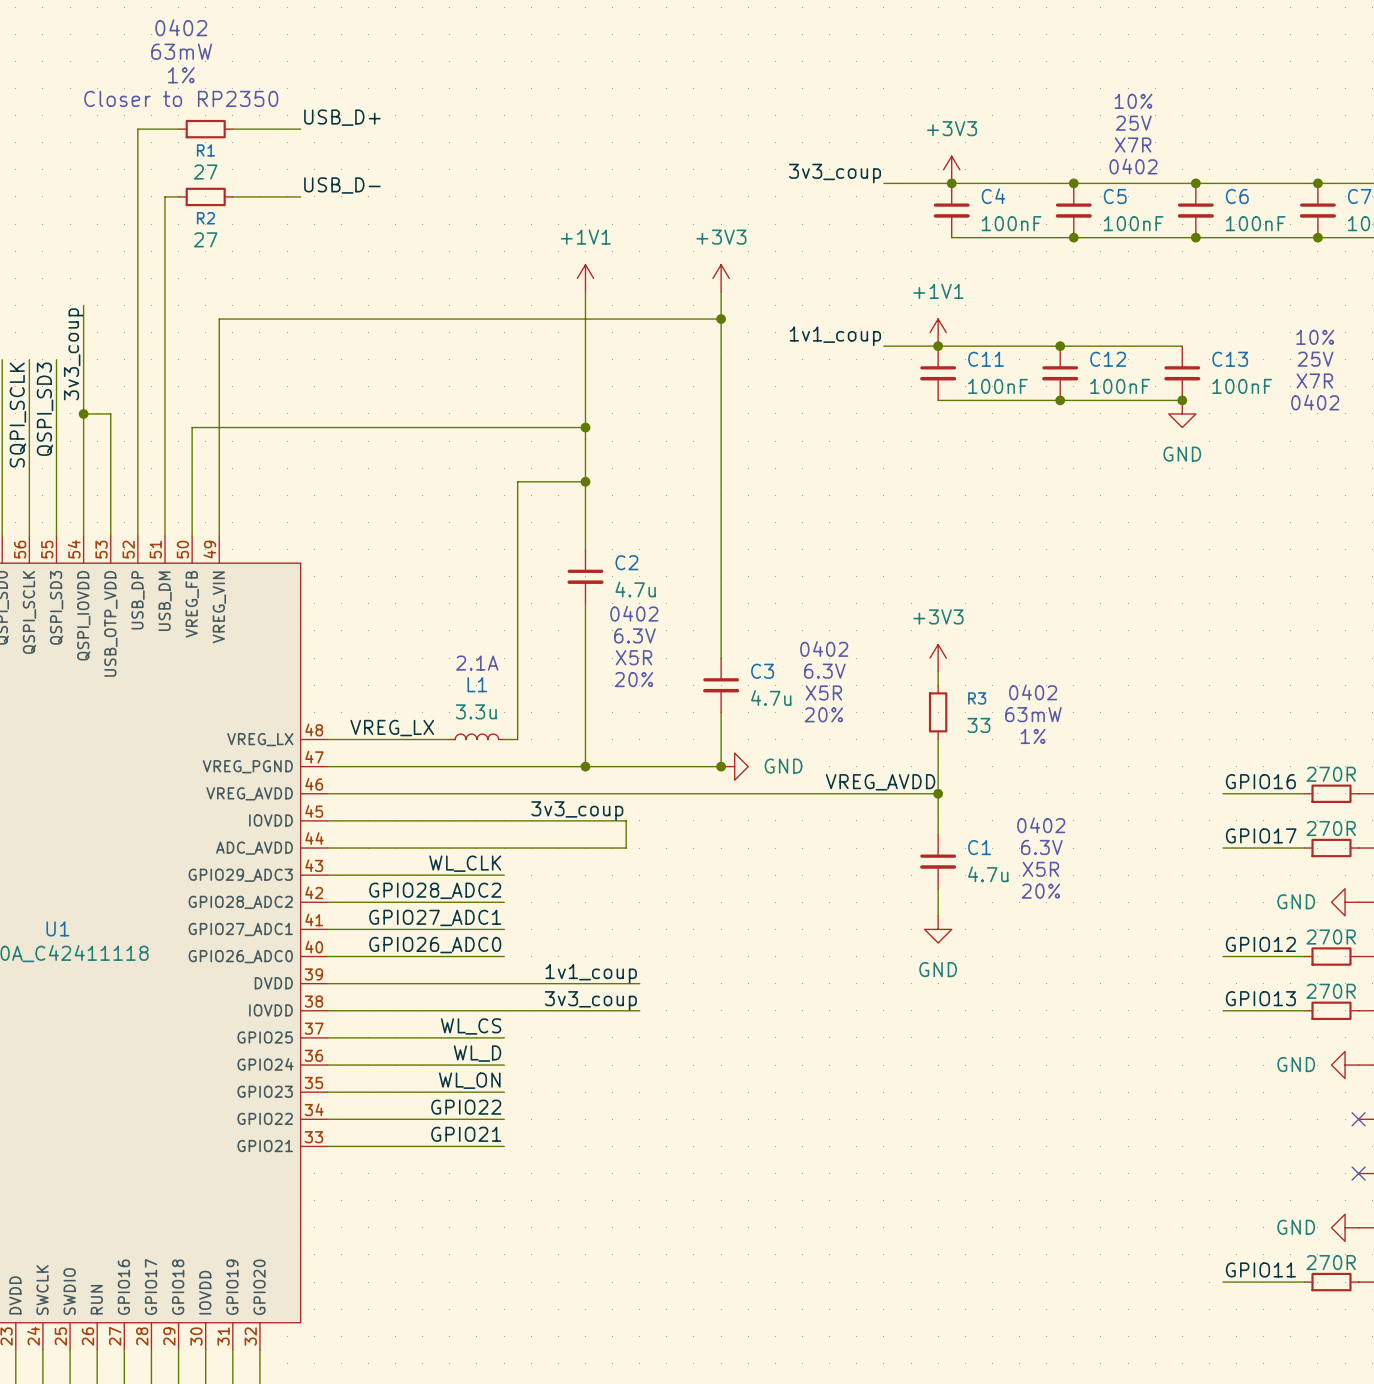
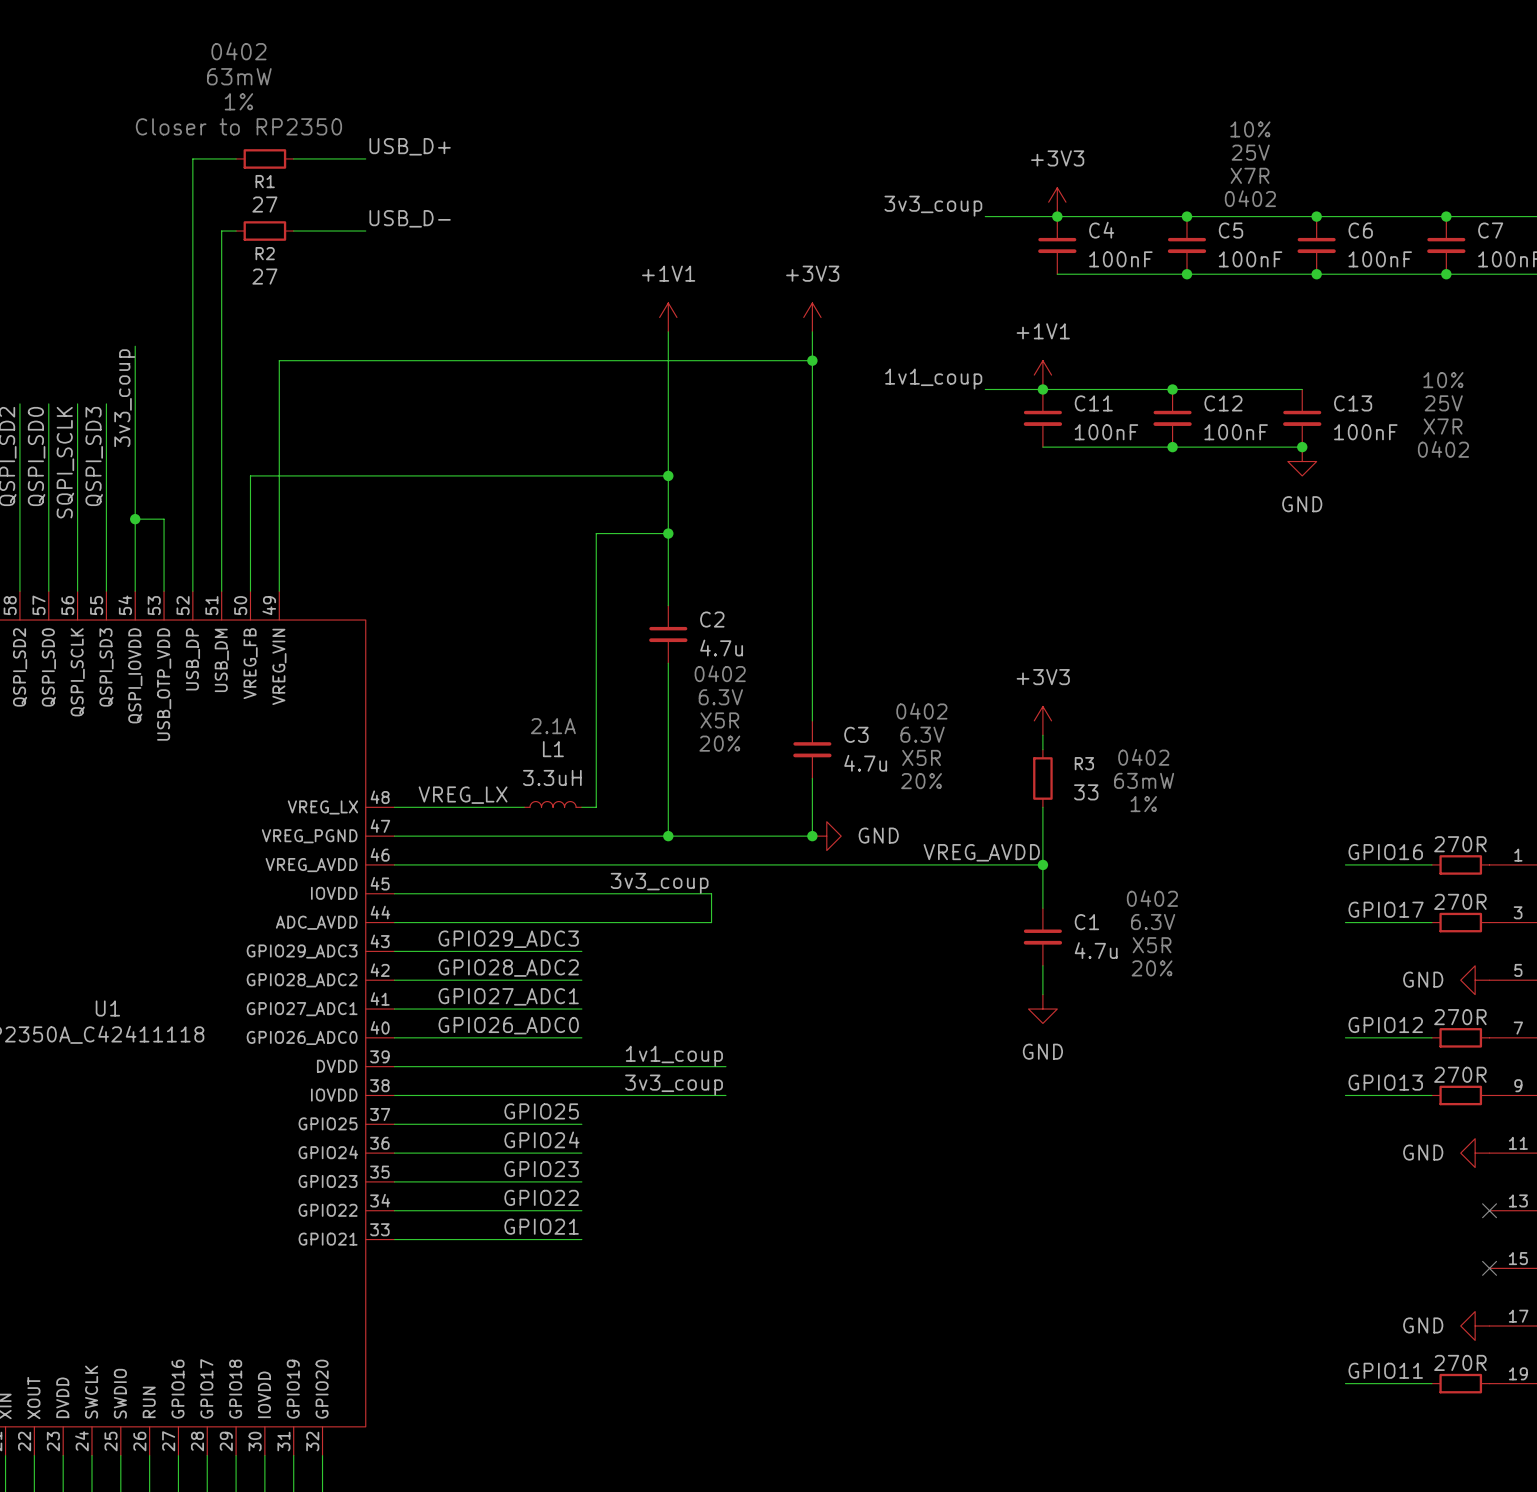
wire: (83, 413) (110, 413) (110, 468) -> (135, 519) (164, 519)
junction position: (83, 413) -> (135, 519)
L1 value: 3.3u (476, 711) -> 3.3uH (552, 777)
label: WL_CLK (465, 863) -> GPIO29_ADC3 (508, 939)
label: WL_CS (471, 1026) -> GPIO25 (541, 1111)
label: WL_D (477, 1053) -> GPIO24 (541, 1139)
label: WL_ON (469, 1080) -> GPIO23 (541, 1169)

